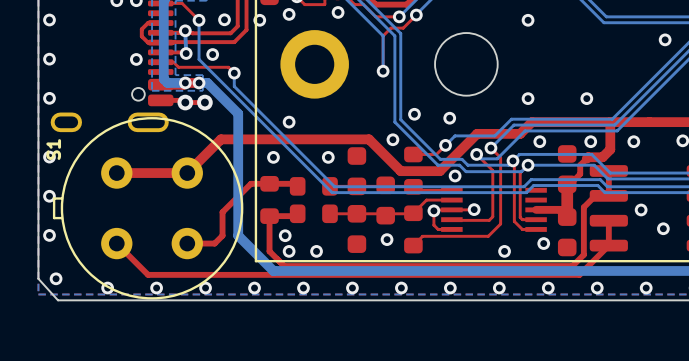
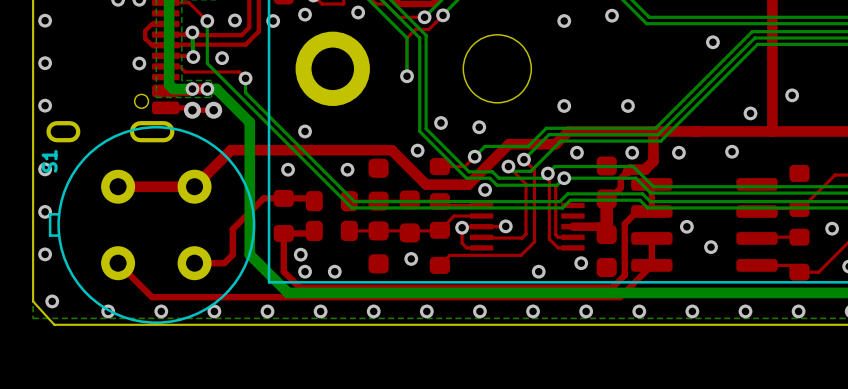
via: none -> (612, 15)

